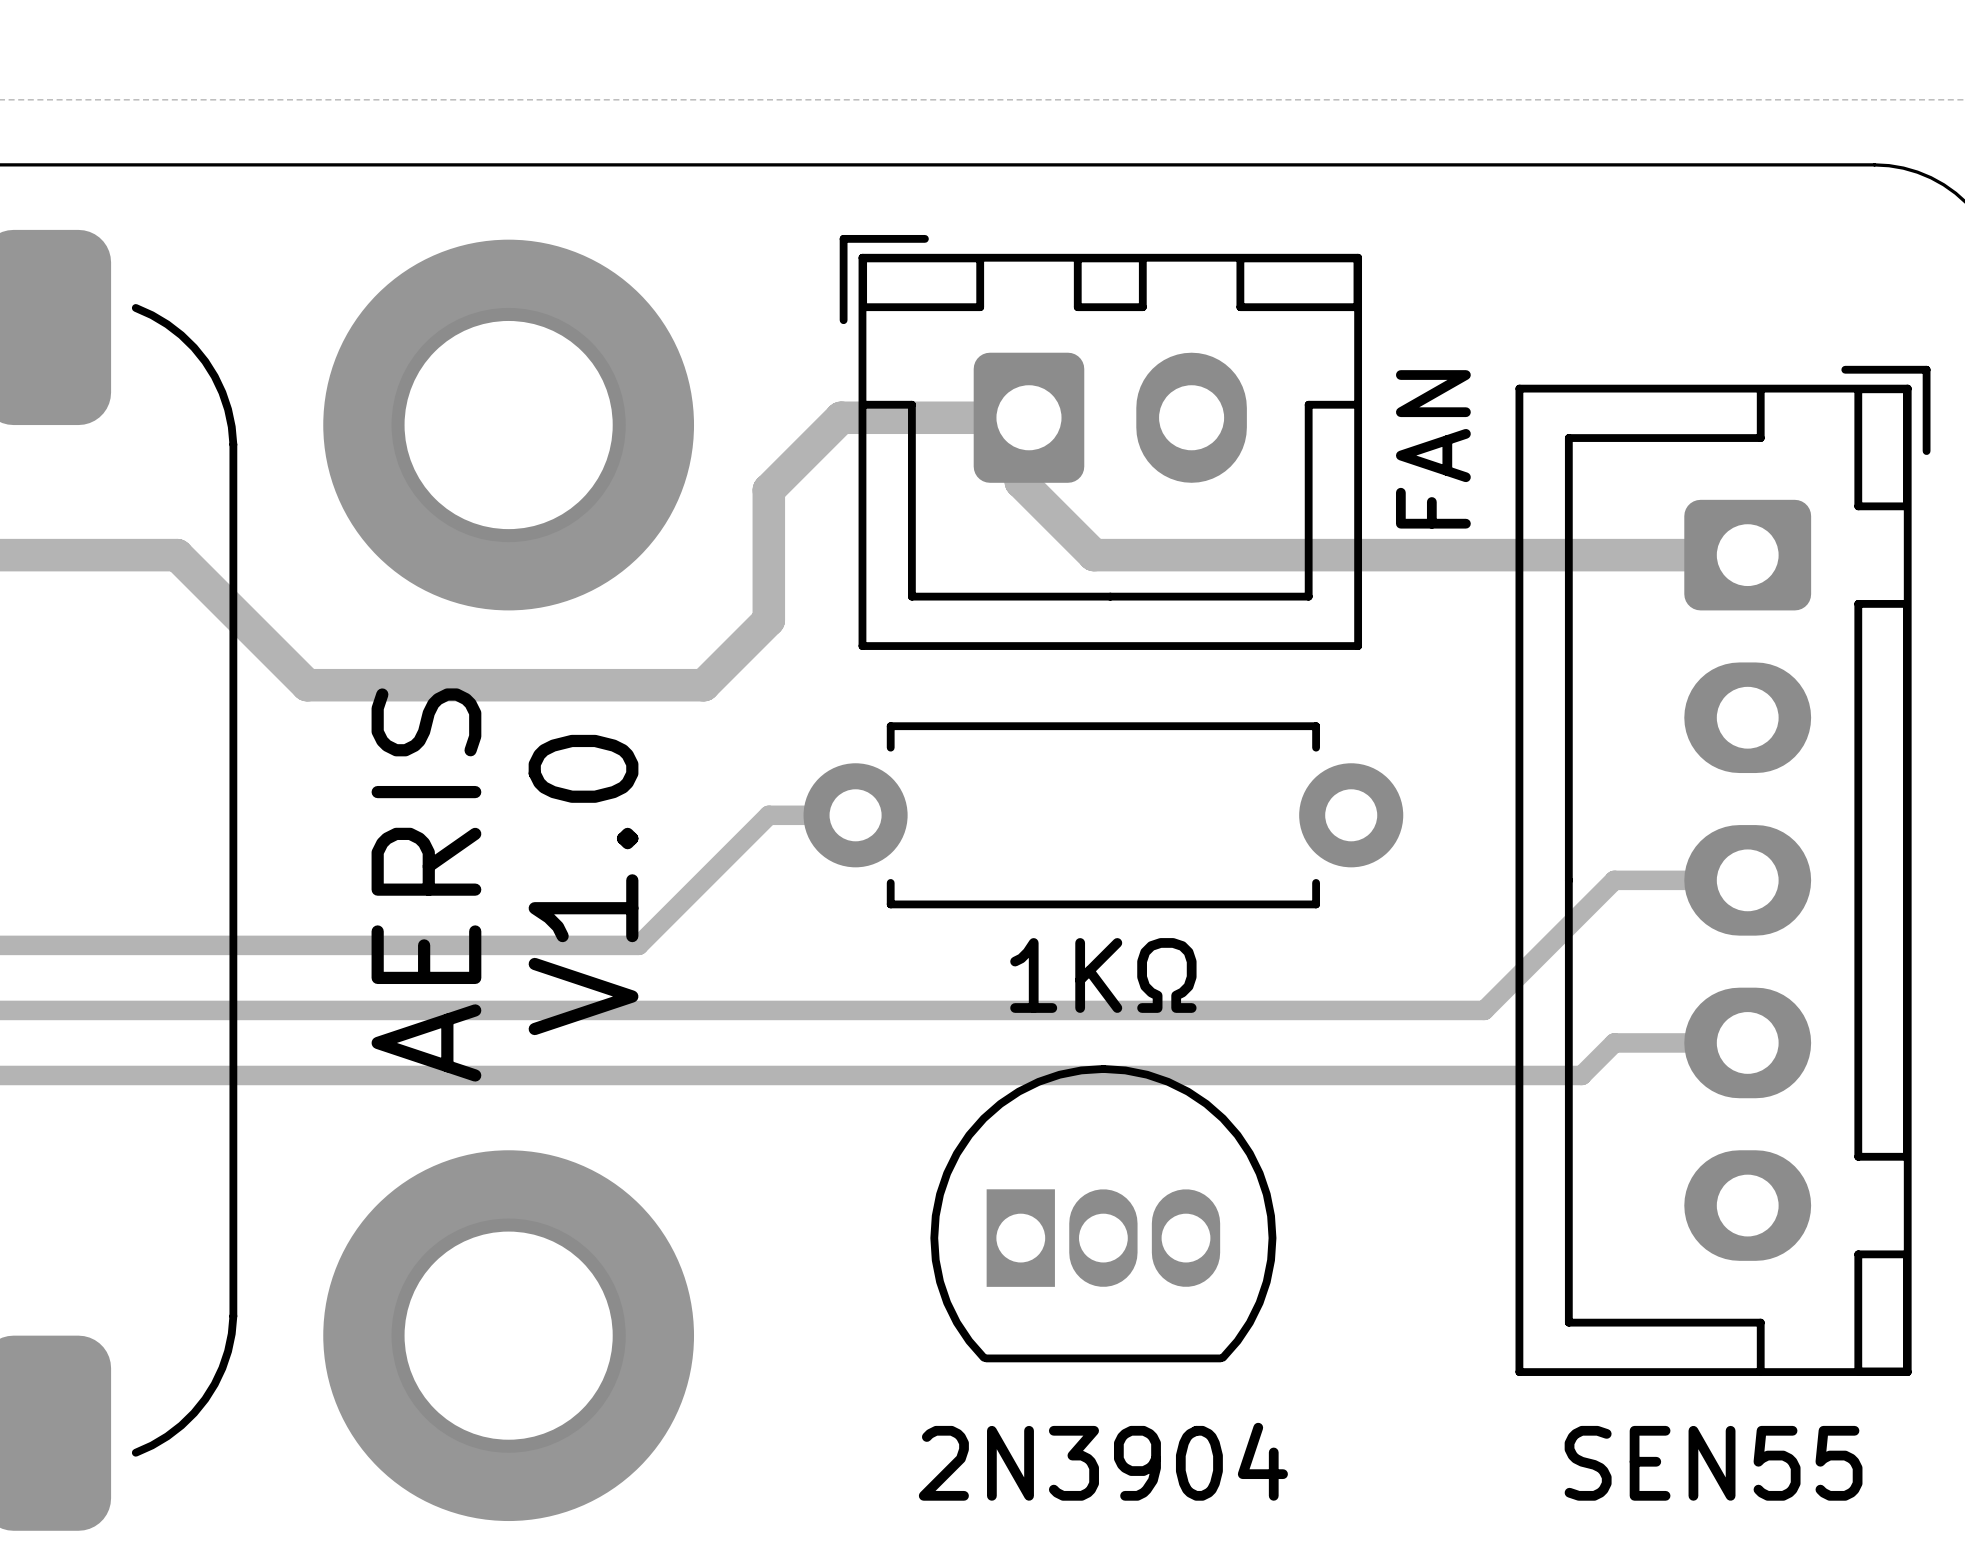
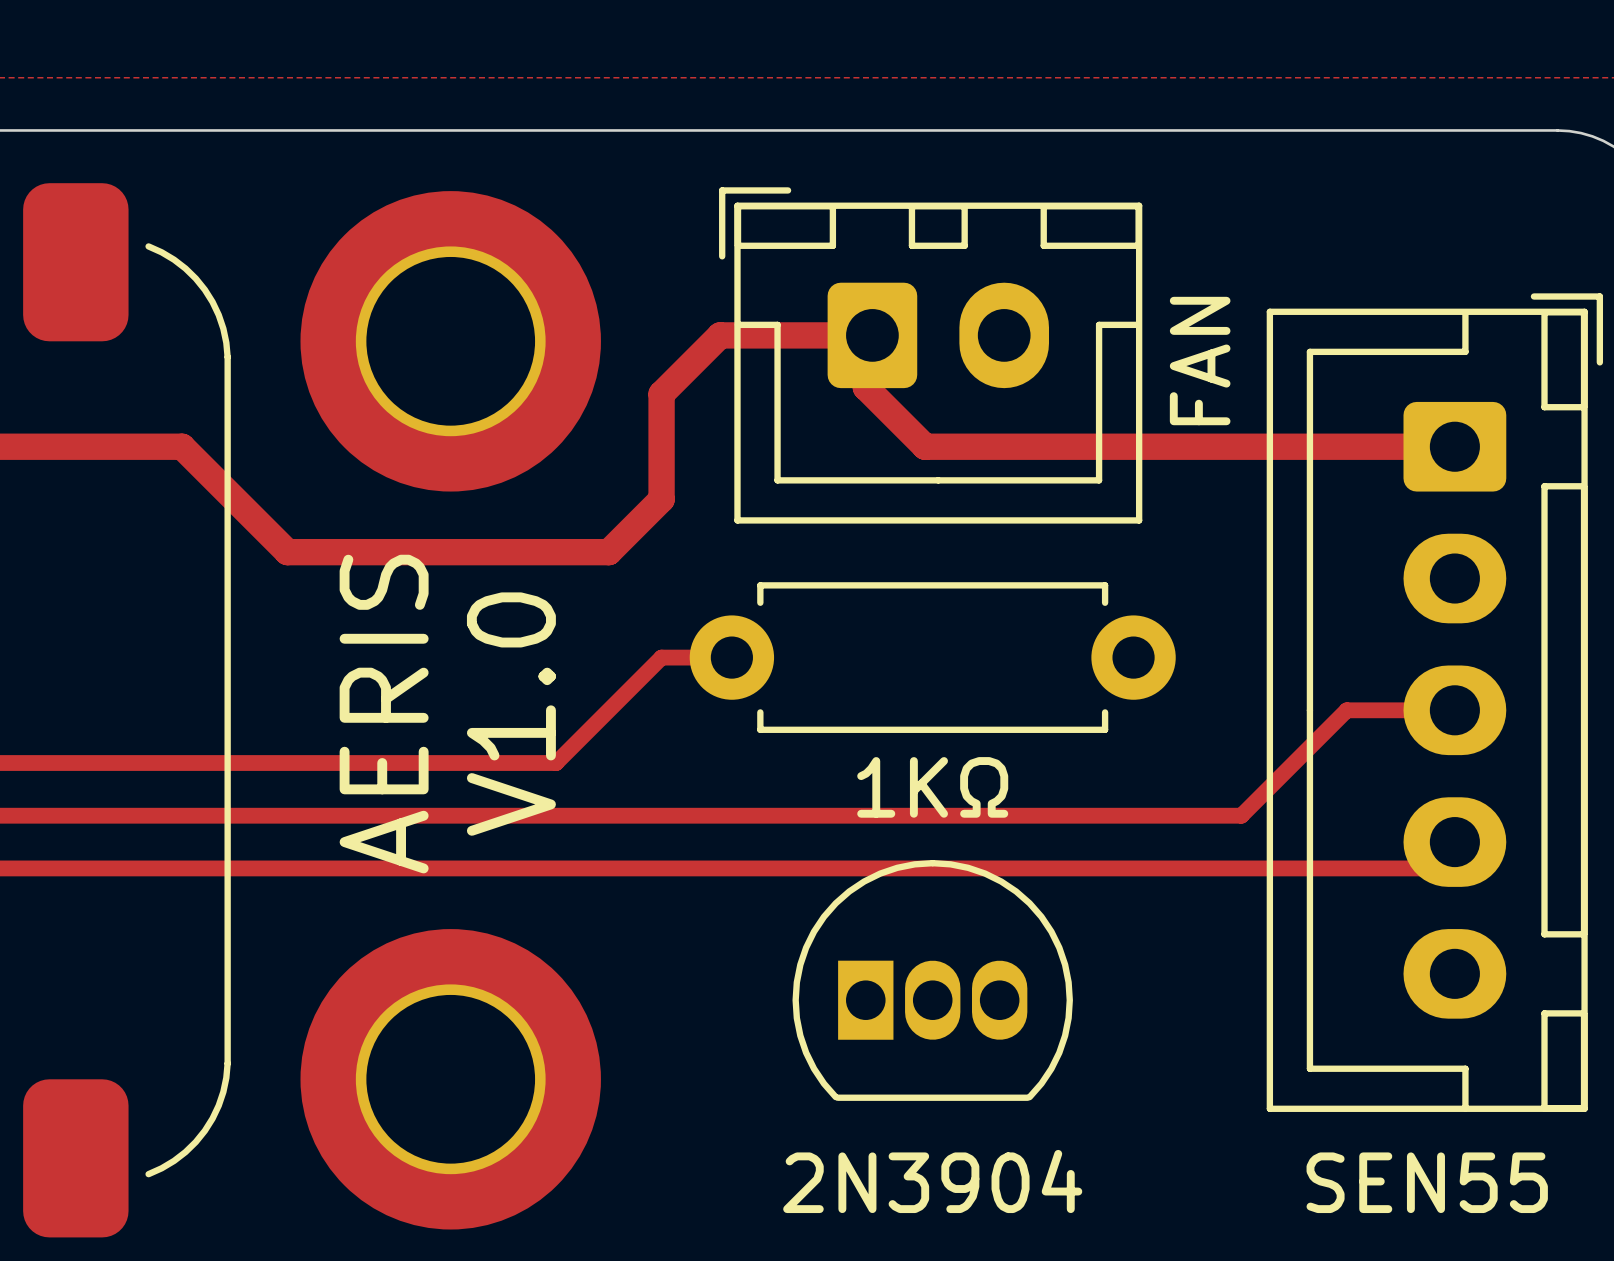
track: (1744, 1042) (1614, 1042) (1581, 1075) -> (1428, 868) (1320, 868)

